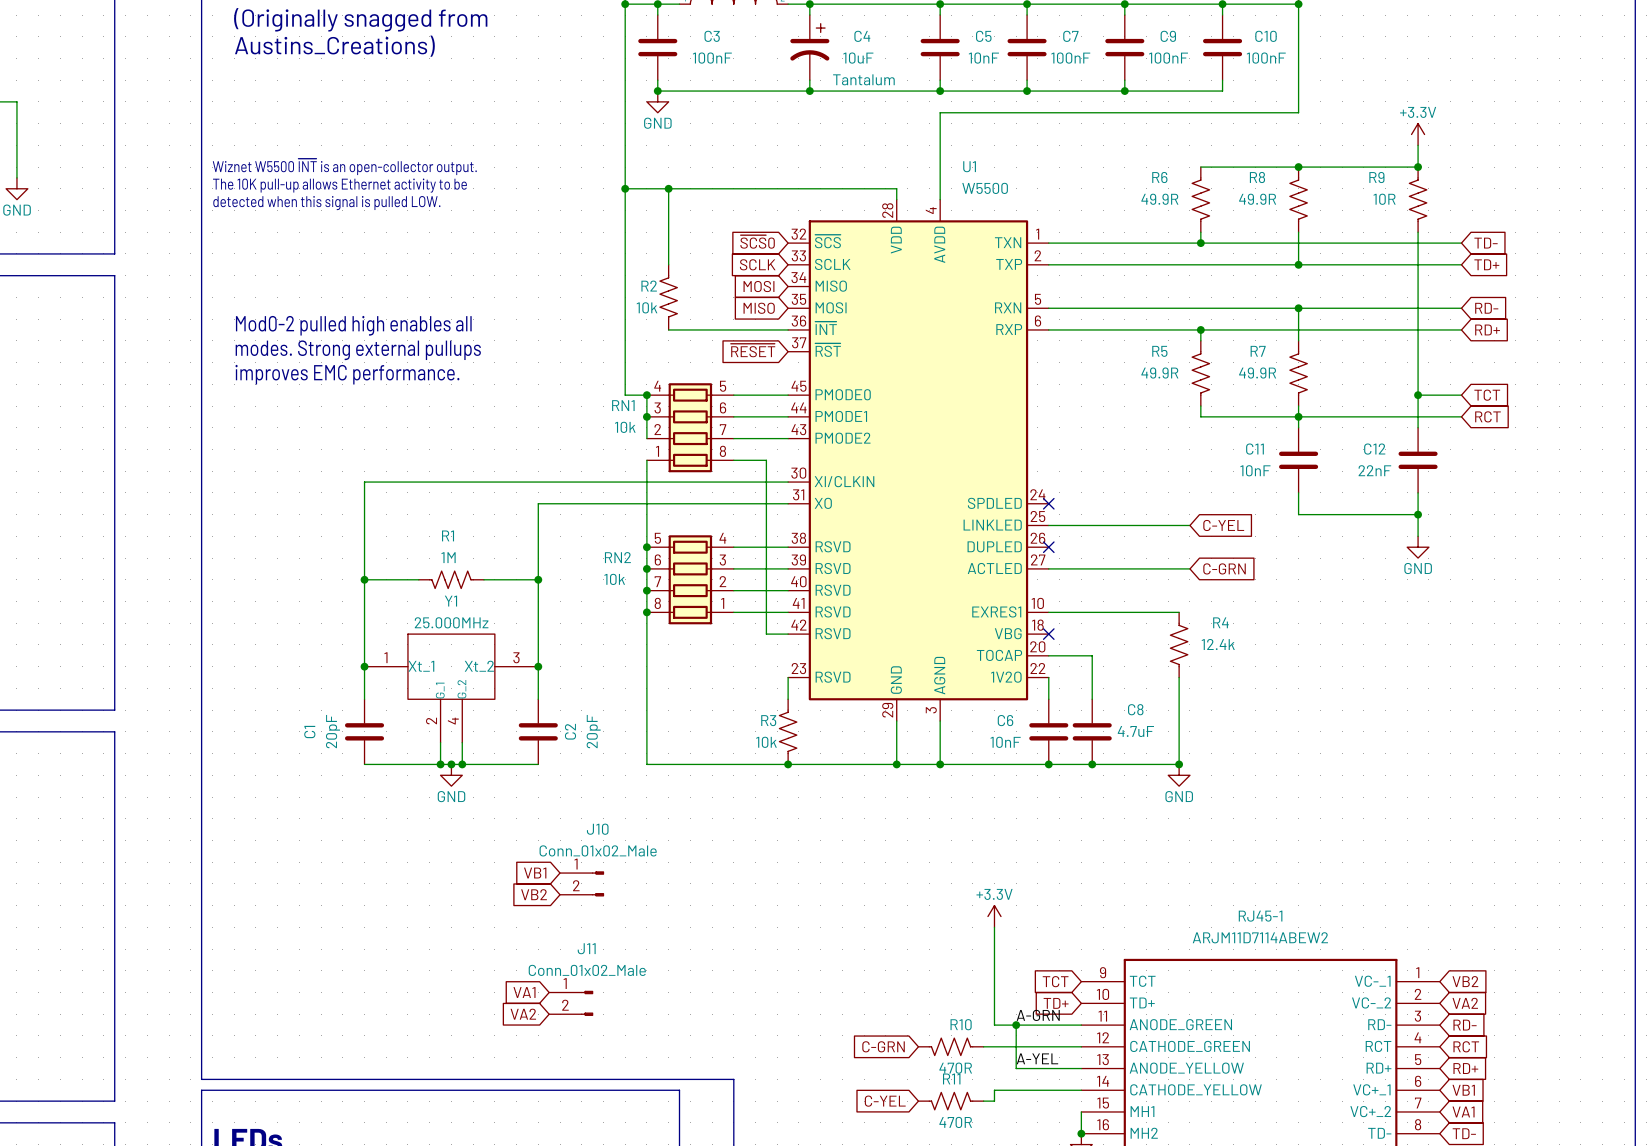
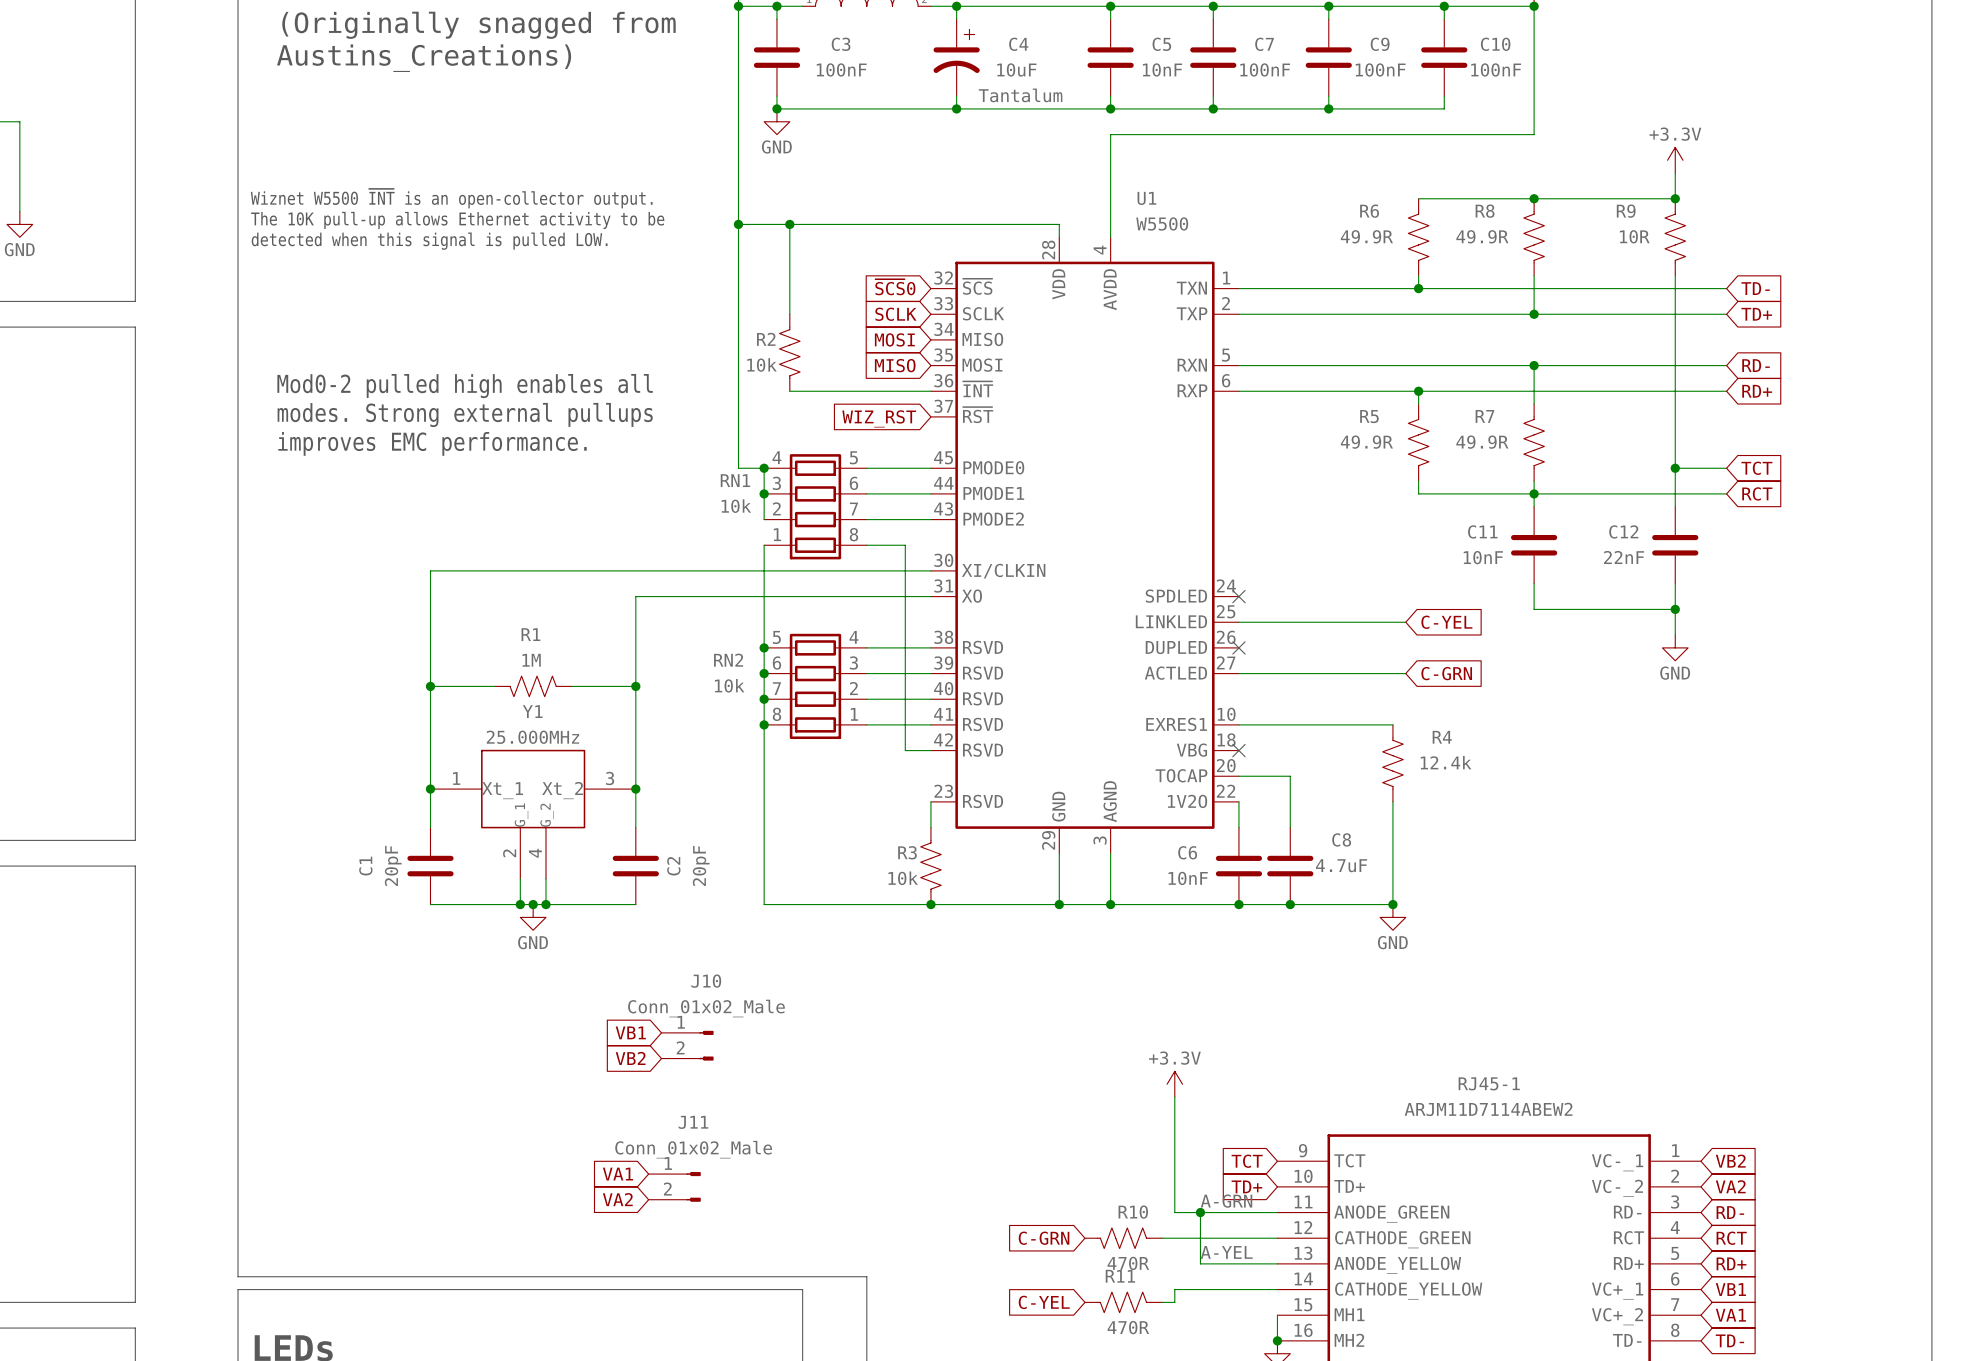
global label: ~{RESET} (753, 350) -> WIZ_RST (879, 418)

